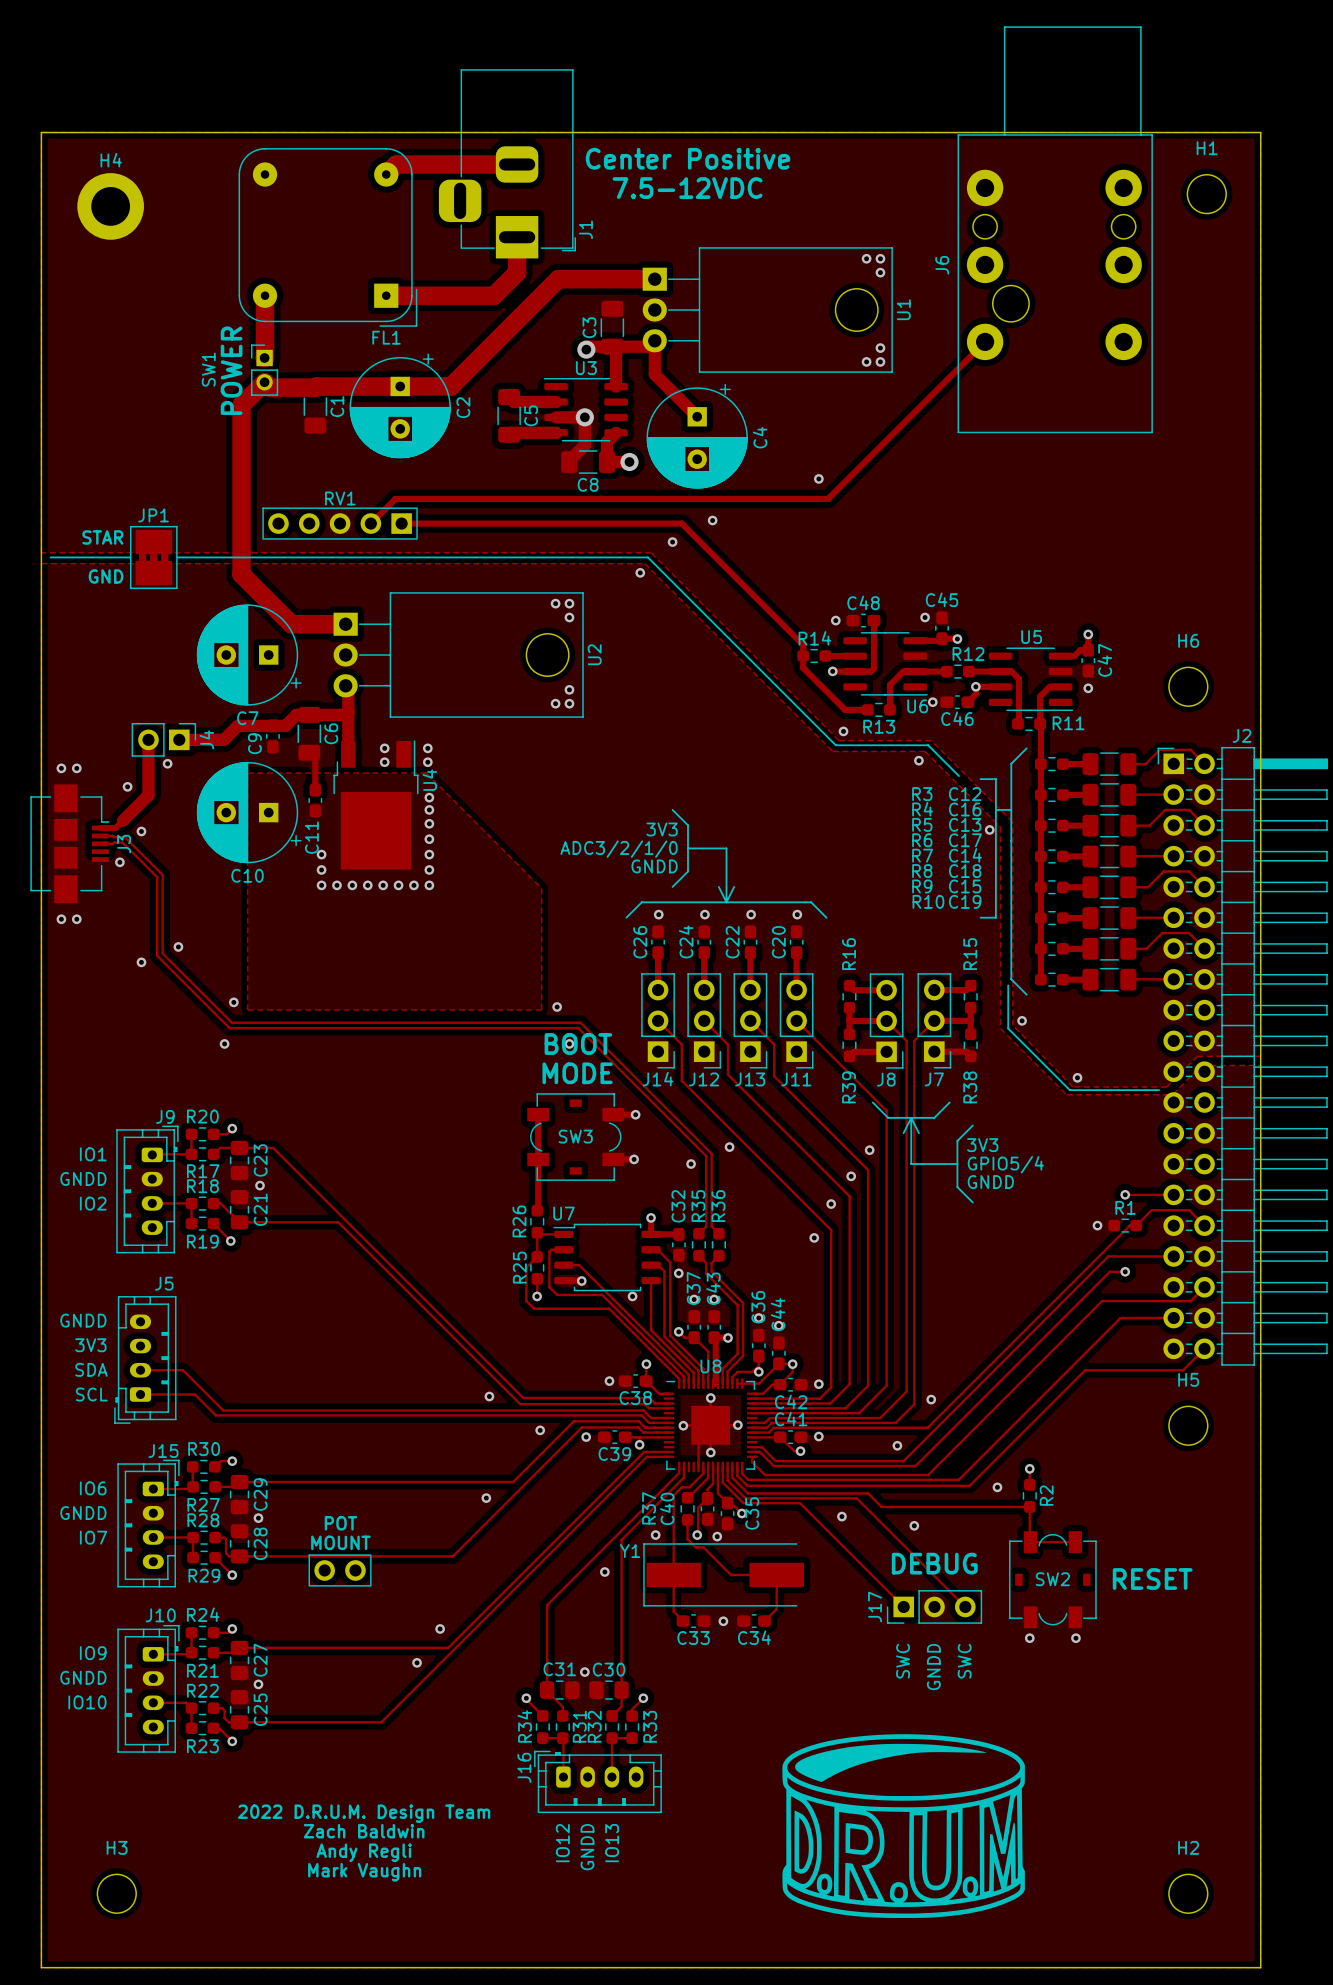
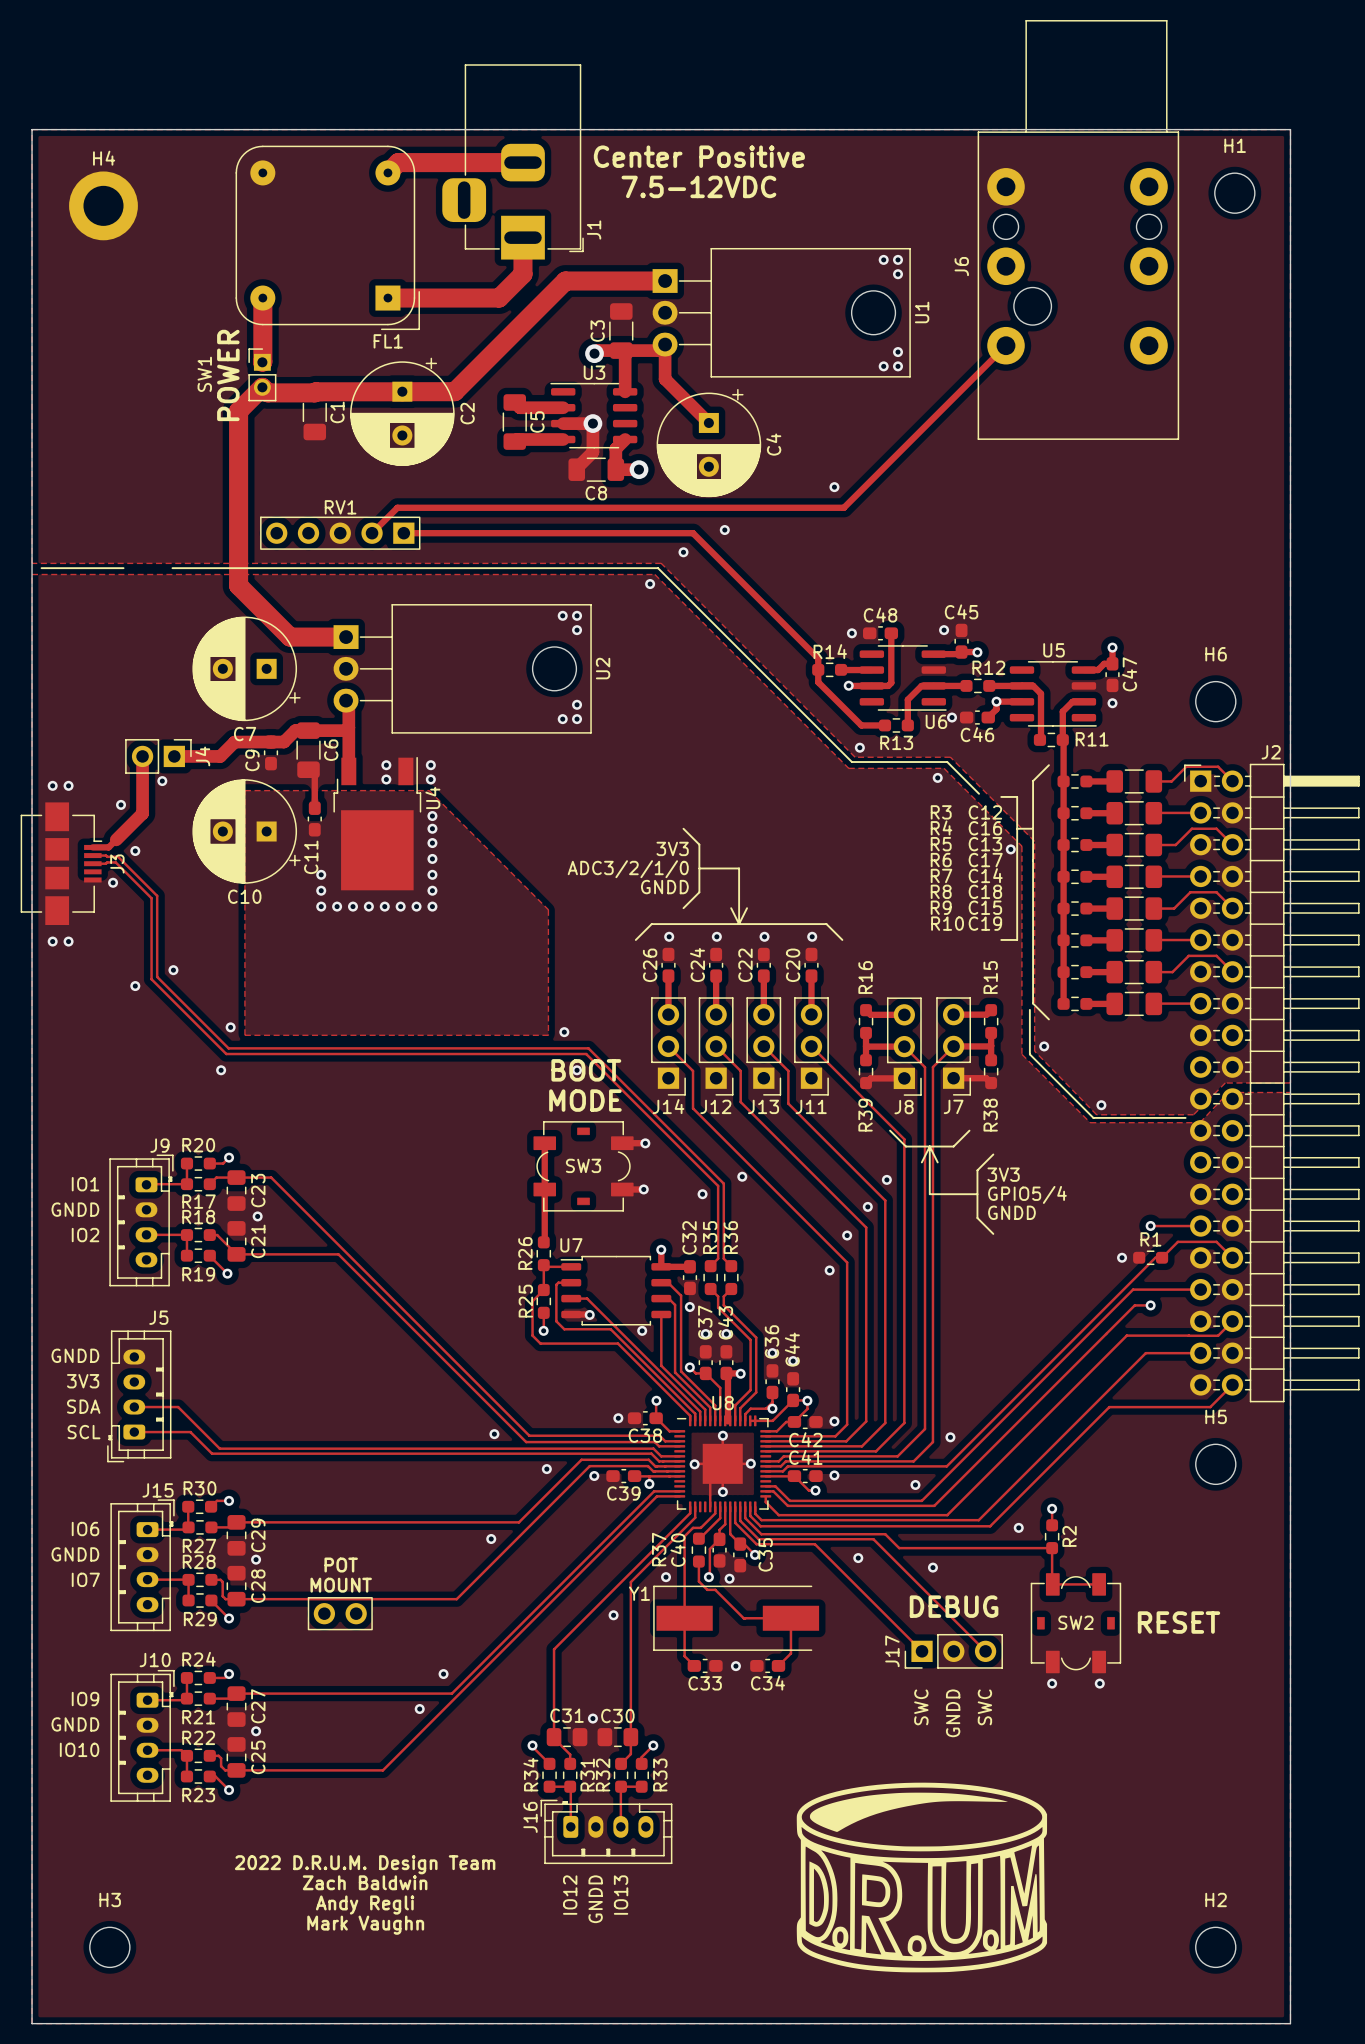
text: STAR (102, 537) -> none
JP1: (153, 557) -> none
text: GND (106, 576) -> none

